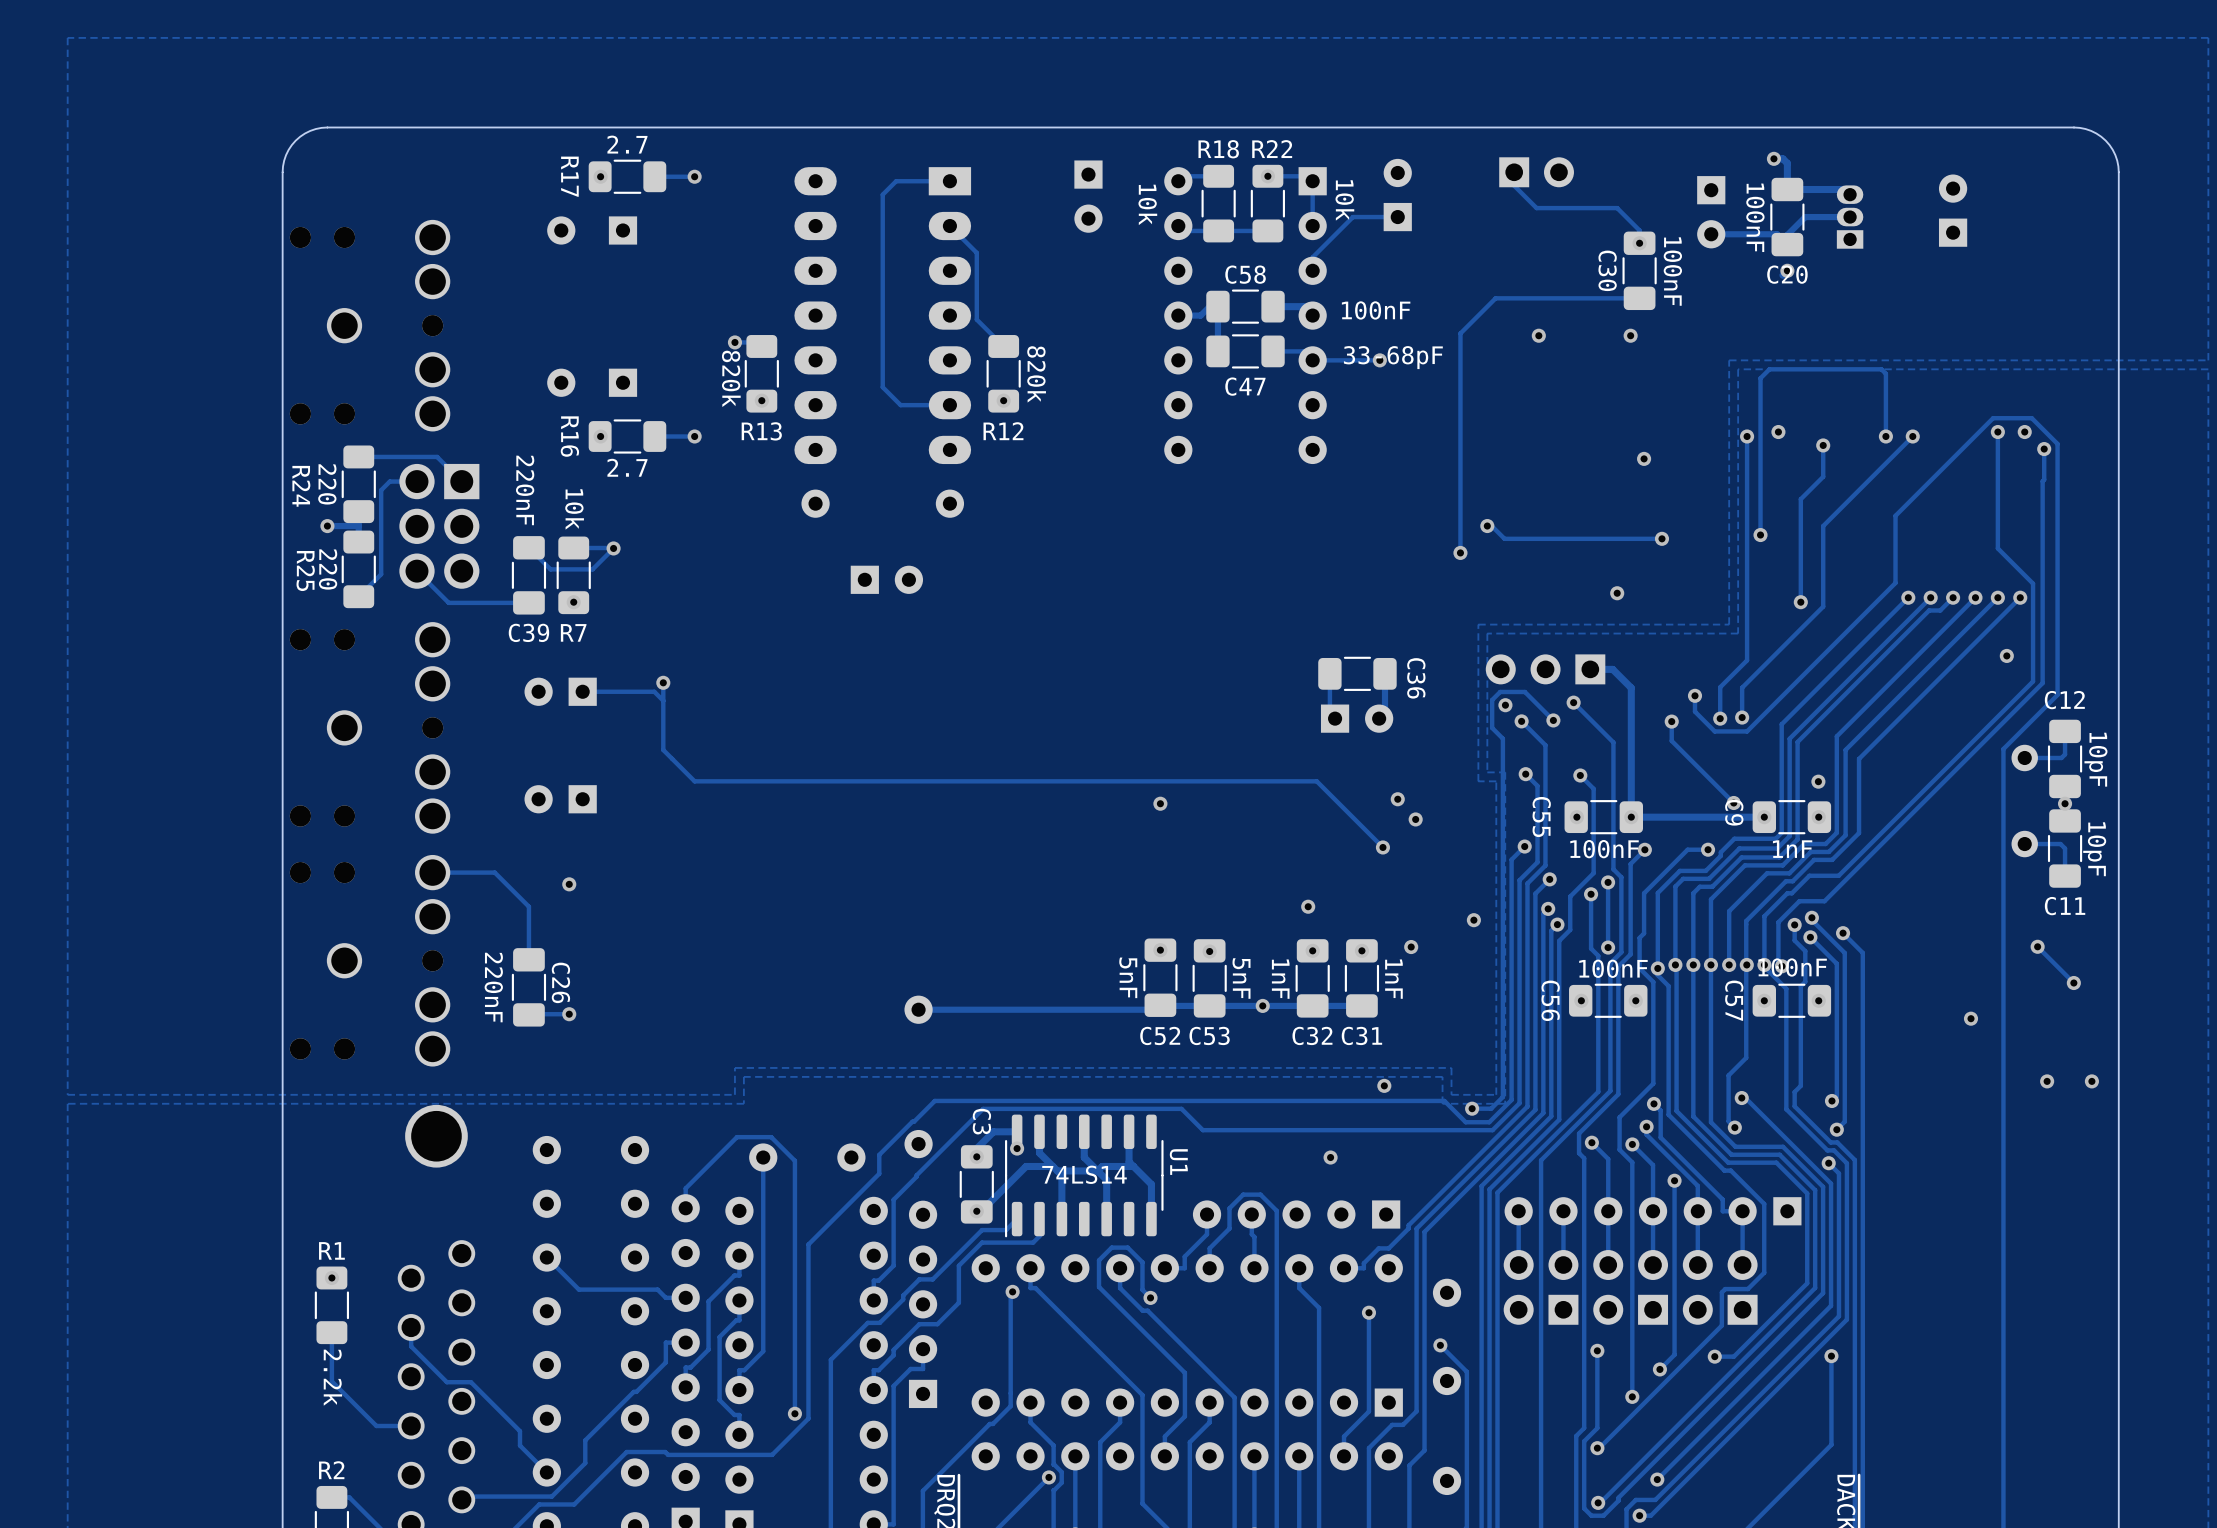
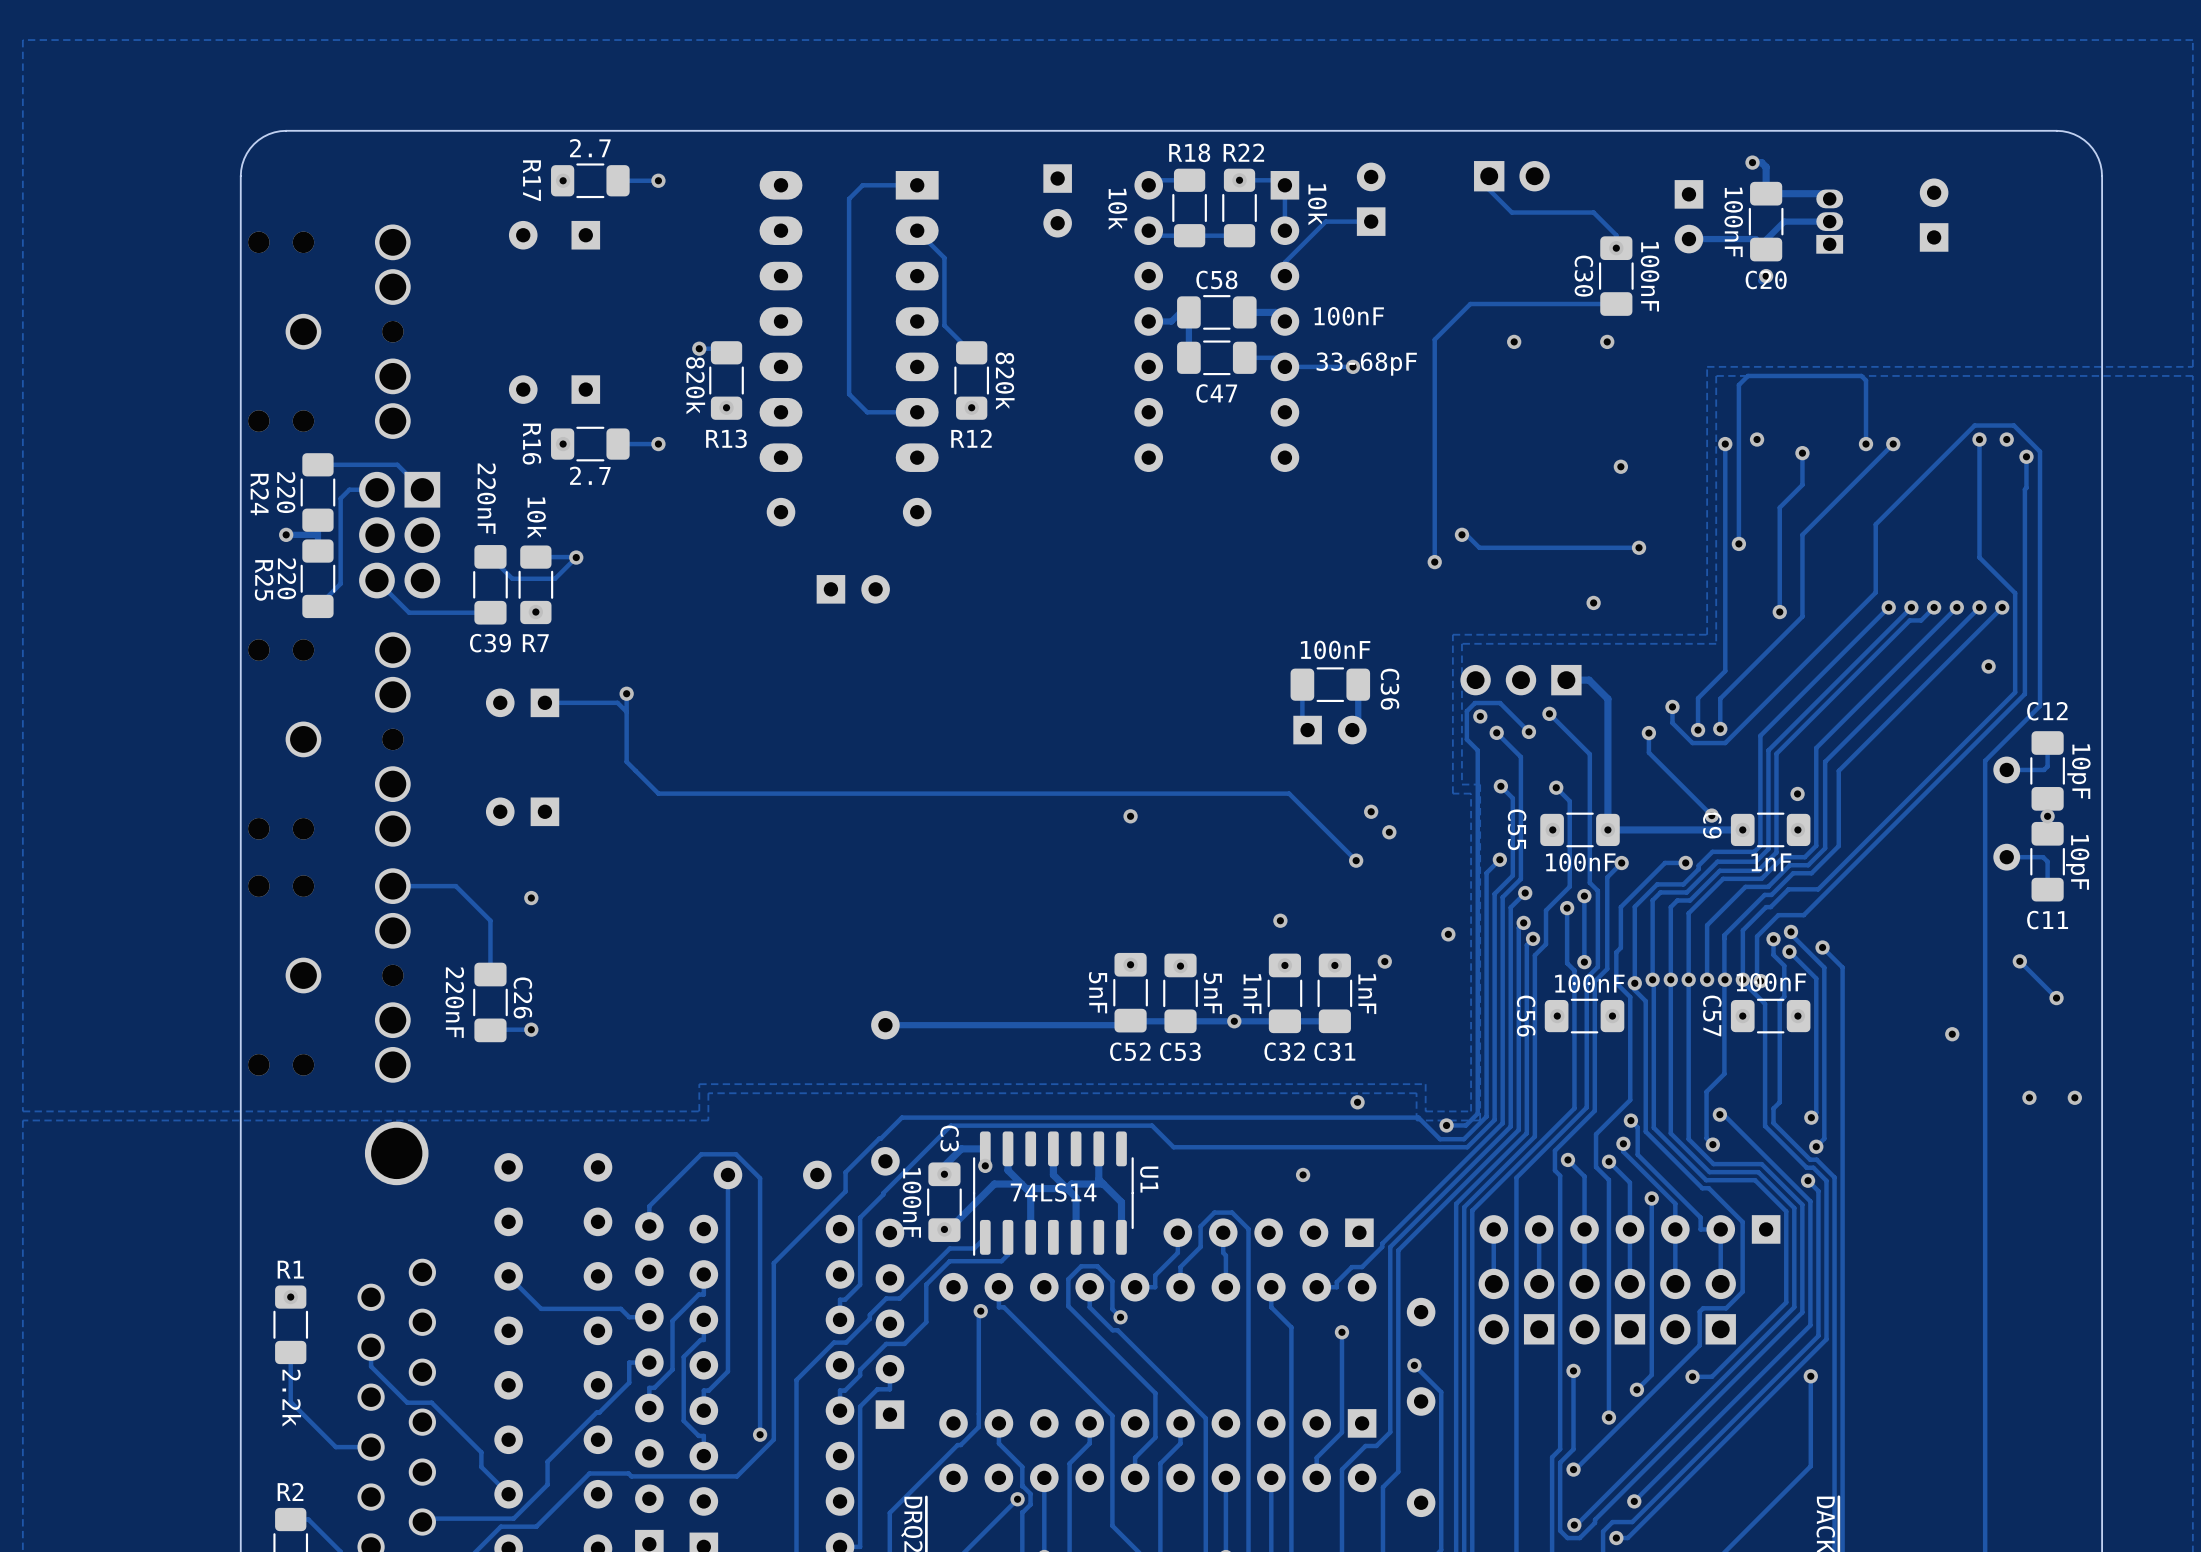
C36 value: none -> 100nF (1335, 649)
C3 value: none -> 100nF (912, 1202)

